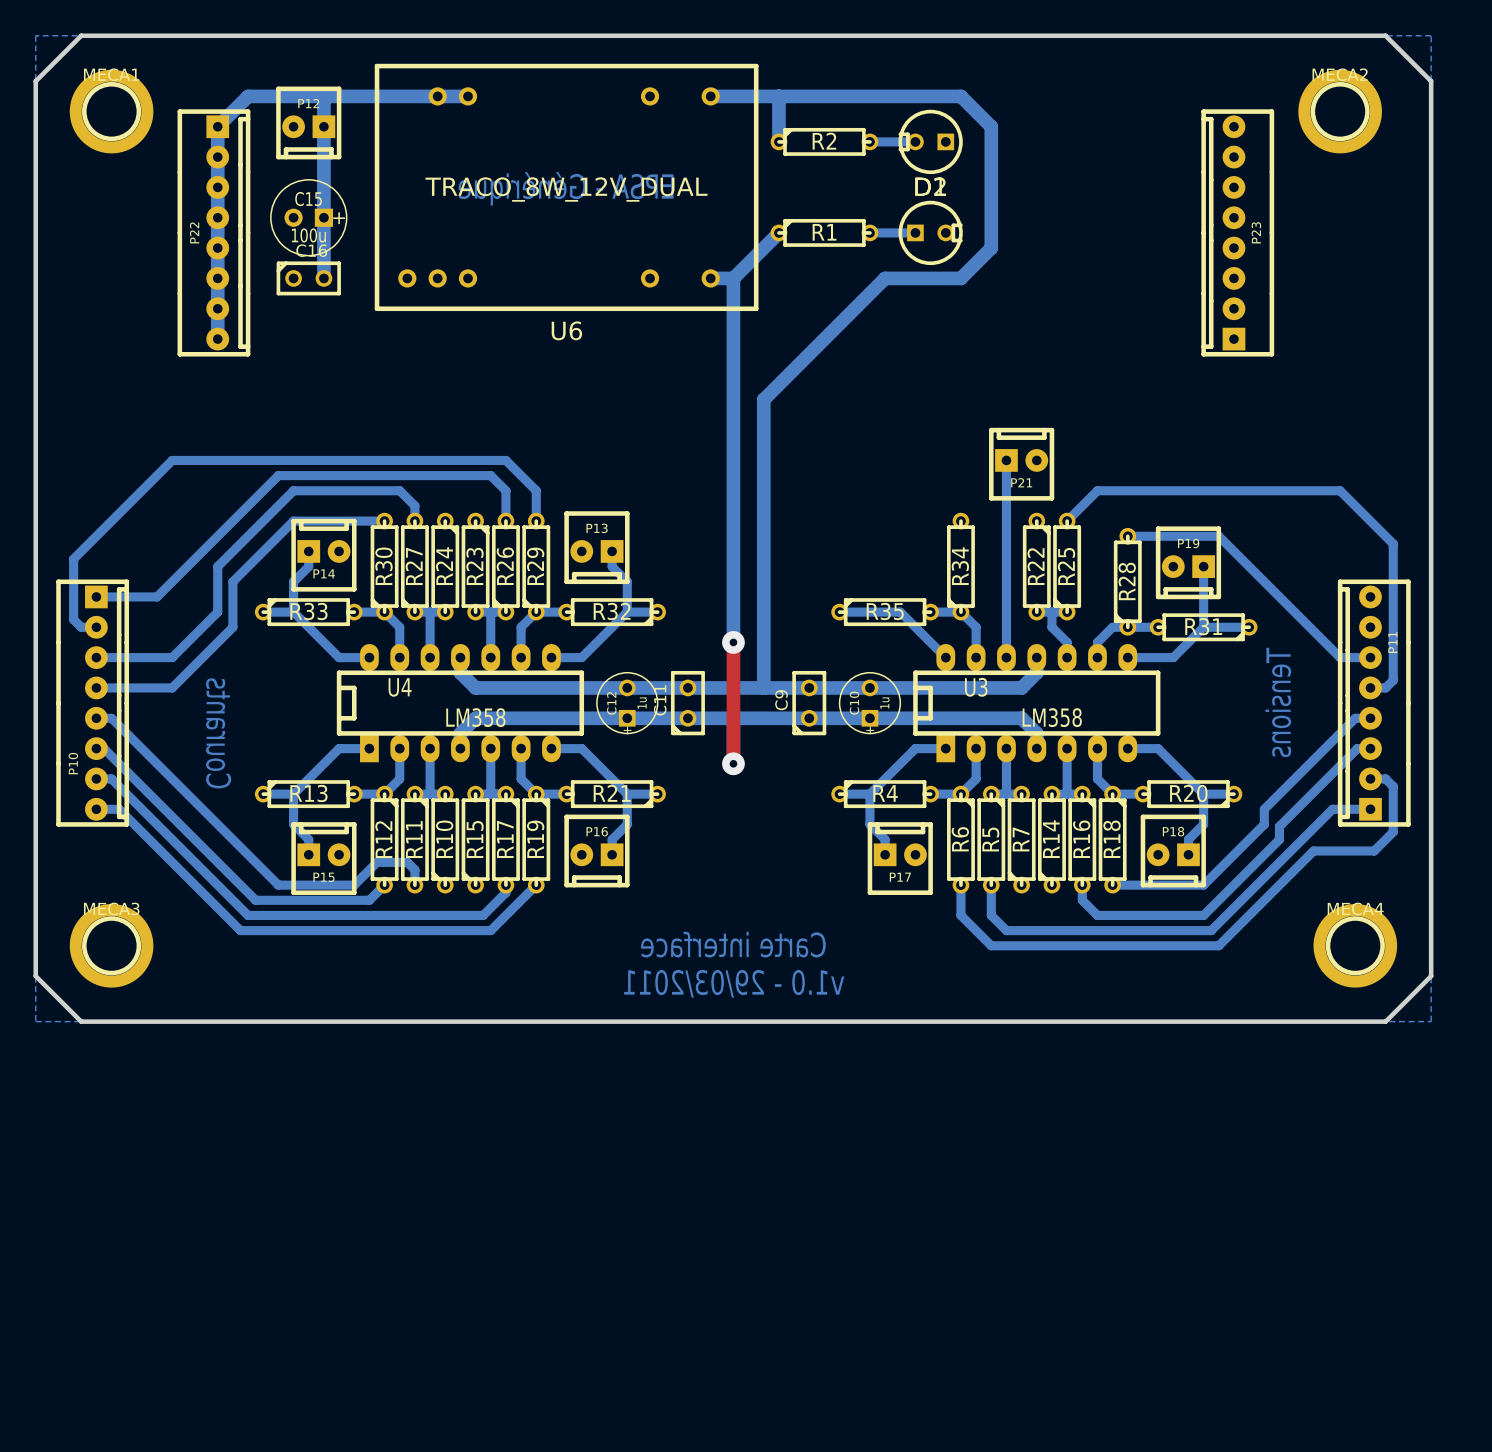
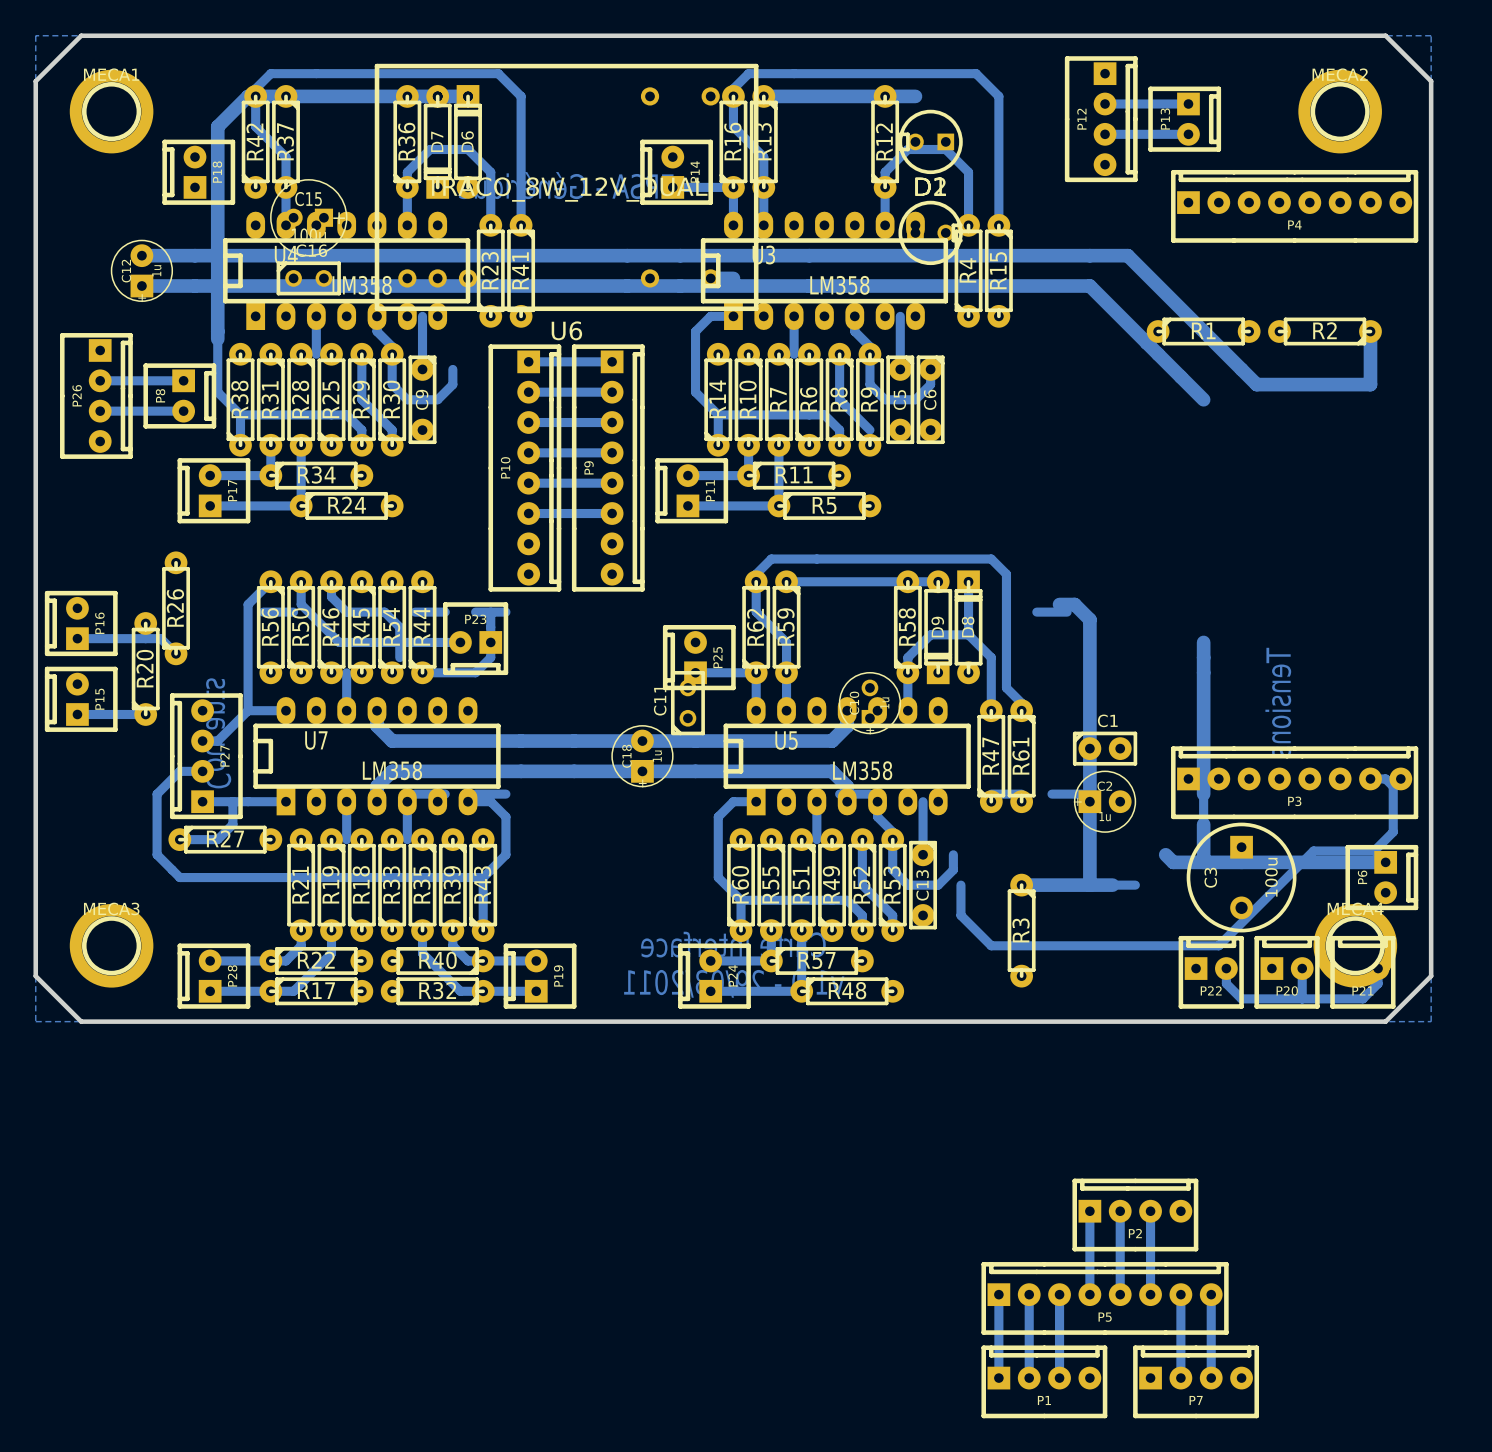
P12 footprint: [276, 86, 342, 160] -> [1064, 56, 1138, 183]
bottom track: (323, 96) (323, 278) -> none
bottom track: (710, 96) (763, 96) -> none
bottom track: (778, 96) (778, 141) -> none
bottom track: (915, 96) (960, 96) (991, 126) (991, 248) (960, 278) (885, 278) (763, 399) (763, 687) -> none
P12 name position: P12 (308, 103) -> P12 (1081, 119)
bottom track: none -> (1105, 104) (1188, 104)
P22 footprint: [177, 109, 251, 357] -> [1178, 935, 1244, 1009]
P23 footprint: [1201, 109, 1275, 357] -> [442, 602, 509, 676]
R2 footprint: [770, 127, 879, 156] -> [1268, 317, 1382, 346]
bottom track: none -> (1105, 134) (1188, 134)
R42: none -> (255, 141)
R37: none -> (286, 141)
R36: none -> (407, 141)
D7: none -> (437, 141)
D6: none -> (468, 141)
bottom track: (869, 141) (915, 141) -> none
bottom track: none -> (672, 187) (733, 187) (733, 225)
P4: none -> (1294, 206)
R1 footprint: [770, 218, 879, 247] -> [1146, 317, 1261, 346]
bottom track: none -> (286, 225) (286, 157) (255, 126) (255, 88) (270, 73) (498, 73) (521, 96) (521, 225)
bottom track: none -> (407, 225) (407, 172) (430, 149) (468, 149) (490, 172) (490, 225)
bottom track: none -> (763, 225) (763, 157) (733, 126) (733, 88) (748, 73) (976, 73) (998, 96) (998, 225)
bottom track: none -> (885, 225) (885, 172) (907, 149) (945, 149) (968, 172) (968, 225)
P22 name position: P22 (194, 232) -> P22 (1211, 990)
bottom track: (778, 232) (733, 278) (733, 642) -> none
bottom track: (869, 232) (915, 232) -> none
P23 name position: P23 (1256, 232) -> P23 (475, 619)
bottom track: none -> (141, 255) (1127, 255) (1256, 384) (1370, 384) (1370, 331)
R41: none -> (521, 270)
bottom track: none -> (141, 286) (1089, 286) (1203, 399)
bottom track: none -> (316, 316) (316, 354)
bottom track: none -> (377, 316) (377, 331) (392, 346) (392, 384) (407, 399) (437, 399) (452, 384) (452, 369)
bottom track: none -> (422, 316) (422, 369)
bottom track: none -> (733, 316) (710, 316) (695, 331) (695, 392) (718, 414)
bottom track: none -> (794, 316) (794, 354)
bottom track: none -> (854, 316) (854, 331) (869, 346) (869, 384) (885, 399) (915, 399) (930, 384) (930, 369)
bottom track: none -> (900, 316) (900, 369)
bottom track: none -> (217, 339) (217, 392) (240, 414)
bottom track: none -> (361, 354) (361, 399) (392, 430) (392, 445)
bottom track: none -> (839, 354) (839, 399) (869, 430)
bottom track: none -> (528, 361) (612, 361)
bottom track: none -> (100, 380) (183, 380)
bottom track: none -> (528, 392) (612, 392)
P26: none -> (96, 395)
P8: none -> (179, 395)
R38: none -> (240, 399)
R8: none -> (839, 399)
R9: none -> (869, 399)
C5: none -> (900, 399)
C6: none -> (930, 399)
bottom track: none -> (100, 411) (183, 411)
bottom track: none -> (240, 414) (346, 414) (361, 430) (361, 445)
bottom track: none -> (240, 414) (240, 445)
bottom track: none -> (718, 414) (718, 445)
bottom track: none -> (718, 414) (824, 414) (839, 430) (839, 445)
bottom track: none -> (528, 422) (612, 422)
bottom track: none -> (270, 445) (270, 475) (210, 475)
bottom track: none -> (301, 445) (301, 505) (210, 505)
bottom track: none -> (748, 445) (748, 475) (687, 475)
bottom track: none -> (778, 445) (778, 505) (687, 505)
bottom track: none -> (528, 452) (612, 452)
bottom track: (1006, 460) (1006, 574) -> (786, 710) (786, 642) (756, 612) (756, 574) (771, 559) (991, 559) (1006, 574)
P21 position: (1021, 464) -> (1362, 972)
P9: none -> (608, 468)
bottom track: none -> (528, 483) (612, 483)
R30 footprint: [370, 512, 399, 621] -> [378, 342, 407, 457]
R27 footprint: [400, 512, 429, 621] -> [168, 825, 283, 854]
R24 footprint: [431, 512, 460, 621] -> [289, 491, 404, 520]
R23 footprint: [461, 512, 490, 621] -> [476, 213, 505, 328]
R26 footprint: [491, 512, 520, 621] -> [162, 551, 191, 666]
R29 footprint: [522, 512, 551, 621] -> [347, 342, 376, 457]
R34 footprint: [947, 512, 975, 621] -> [259, 461, 374, 490]
R22 footprint: [1022, 512, 1051, 621] -> [259, 947, 374, 975]
R25 footprint: [1053, 512, 1082, 621] -> [317, 342, 346, 457]
bottom track: none -> (528, 513) (612, 513)
bottom track: (384, 521) (293, 521) (232, 581) (232, 627) (172, 687) (96, 687) -> none
bottom track: (414, 521) (414, 505) (399, 490) (293, 490) (217, 566) (217, 612) (172, 657) (96, 657) -> none
bottom track: (505, 521) (505, 490) (490, 475) (278, 475) (157, 596) (96, 596) -> none
bottom track: (536, 521) (536, 490) (505, 460) (172, 460) (73, 559) (73, 619) (81, 627) (96, 627) -> none
bottom track: (1067, 521) (1097, 490) (1340, 490) (1393, 543) (1393, 680) (1385, 687) (1370, 687) -> none
R28 footprint: [1113, 527, 1142, 636] -> [287, 342, 316, 457]
bottom track: (1127, 536) (1218, 536) (1340, 657) (1370, 657) -> none
P13 rotation: 0° (596, 547) -> 90° counterclockwise (1184, 119)
P13 position: (596, 547) -> (1184, 119)
bottom track: (308, 551) (308, 566) (293, 581) (293, 612) (339, 657) (369, 657) -> none
bottom track: (612, 551) (612, 566) (627, 581) (627, 612) -> none
P14 rotation: 0° (323, 555) -> 90° counterclockwise (676, 172)
P14 position: (323, 555) -> (676, 172)
P19 rotation: 0° (1188, 562) -> 90° clockwise (540, 976)
P19 position: (1188, 562) -> (540, 976)
bottom track: (1203, 566) (1203, 627) -> none
P11 footprint: [1337, 579, 1411, 827] -> [655, 458, 729, 524]
bottom track: none -> (270, 581) (248, 604) (248, 710)
bottom track: none -> (301, 581) (301, 604) (339, 642) (460, 642)
bottom track: none -> (331, 581) (331, 596) (346, 612) (354, 612)
bottom track: none -> (786, 581) (938, 581)
bottom track: none -> (968, 581) (968, 634)
R33 footprint: [254, 598, 363, 627] -> [378, 828, 407, 943]
R32 footprint: [558, 598, 666, 627] -> [380, 977, 495, 1006]
R35 footprint: [831, 598, 939, 627] -> [408, 828, 437, 943]
bottom track: none -> (1059, 604) (1074, 604) (1089, 619) (1089, 885)
bottom track: (430, 612) (430, 657) -> none
bottom track: (566, 612) (536, 612) (521, 627) (521, 657) -> none
bottom track: (627, 612) (581, 657) (551, 657) -> none
bottom track: (627, 612) (657, 612) -> none
bottom track: (839, 612) (900, 612) (945, 657) -> none
bottom track: (930, 612) (960, 612) (976, 627) (976, 657) -> none
bottom track: (1051, 612) (1051, 627) (1067, 642) (1067, 657) -> none
R31 footprint: [1149, 613, 1258, 642] -> [256, 342, 285, 457]
R56: none -> (270, 627)
R50: none -> (301, 627)
R46: none -> (331, 627)
R45: none -> (361, 627)
R54: none -> (392, 627)
R44: none -> (422, 627)
R62: none -> (756, 627)
R59: none -> (786, 627)
R58: none -> (907, 627)
D9: none -> (938, 627)
D8: none -> (968, 627)
bottom track: (1158, 627) (1112, 627) (1097, 642) (1097, 657) -> none
bottom track: (1203, 627) (1249, 627) -> none
bottom track: (1203, 627) (1173, 657) (1127, 657) -> none
bottom track: none -> (968, 634) (930, 634) (907, 657) (907, 710)
bottom track: none -> (968, 634) (991, 657) (991, 710)
bottom track: none -> (77, 638) (160, 638) (176, 653)
top track: (733, 642) (733, 763) -> none
via: (733, 642) -> none
bottom track: none -> (1203, 642) (1203, 794)
P11 name position: P11 (1392, 642) -> P11 (710, 490)
bottom track: (460, 657) (460, 672) (475, 687) (1021, 687) (1036, 672) (1036, 657) -> none
bottom track: none -> (490, 657) (475, 672) (422, 672)
P25: none -> (699, 657)
bottom track: none -> (1006, 657) (1006, 687) (1021, 703) (1021, 710)
C9 footprint: [792, 670, 827, 736] -> [408, 355, 437, 445]
C12 footprint: [596, 671, 659, 735] -> [110, 239, 174, 302]
bottom track: none -> (346, 672) (346, 710)
bottom track: none -> (695, 672) (756, 672) (756, 710)
C9 name position: C9 (781, 700) -> C9 (422, 399)
P10 position: (92, 703) -> (524, 468)
U4 position: (460, 703) -> (346, 270)
U3 position: (1036, 703) -> (824, 270)
bottom track: none -> (248, 710) (217, 741) (202, 741)
bottom track: none -> (248, 710) (286, 710)
bottom track: none -> (377, 710) (377, 725) (392, 741) (832, 741) (847, 725) (847, 710)
bottom track: none -> (77, 714) (145, 714)
bottom track: (96, 718) (111, 718) (278, 885) (354, 885) (377, 862) (407, 862) (414, 869) (414, 885) -> none
bottom track: (1370, 718) (1355, 718) (1264, 809) (1264, 824) (1203, 885) (1135, 885) -> none
bottom track: (96, 748) (104, 748) (255, 900) (369, 900) (384, 885) -> none
bottom track: (369, 748) (339, 748) (293, 794) -> none
bottom track: (399, 748) (399, 778) (384, 794) (354, 794) -> none
bottom track: (430, 748) (430, 794) -> none
bottom track: (460, 748) (460, 733) (475, 718) (1021, 718) (1036, 733) (1036, 748) -> none
bottom track: (490, 748) (490, 794) -> none
bottom track: (521, 748) (521, 778) (536, 794) (566, 794) -> none
bottom track: (551, 748) (581, 748) (627, 794) -> none
bottom track: (945, 748) (915, 748) (869, 794) (869, 824) (885, 839) (885, 854) -> none
bottom track: (976, 748) (976, 778) (960, 794) (930, 794) -> none
bottom track: (1006, 748) (1006, 794) -> none
bottom track: (1067, 748) (1067, 794) -> none
bottom track: (1097, 748) (1097, 778) (1112, 794) (1142, 794) -> none
C1: none -> (1105, 748)
bottom track: (1127, 748) (1158, 748) (1203, 794) (1233, 794) -> none
bottom track: (1370, 748) (1357, 748) (1279, 826) (1279, 839) (1203, 915) (1097, 915) (1082, 900) (1082, 885) -> none
P27: none -> (206, 756)
U7: none -> LM358 (377, 756)
C18: none -> 1u (642, 756)
U5: none -> LM358 (847, 756)
R47: none -> (991, 756)
R61: none -> (1021, 756)
P10 name position: P10 (73, 763) -> P10 (505, 467)
via: (733, 763) -> none
bottom track: none -> (202, 771) (179, 771) (157, 794) (157, 854) (179, 877) (483, 877)
bottom track: (96, 778) (111, 778) (248, 915) (483, 915) (505, 892) (505, 885) -> none
R13 footprint: [254, 780, 363, 809] -> [749, 85, 778, 199]
R21 footprint: [558, 780, 666, 809] -> [287, 828, 316, 943]
R4 footprint: [831, 780, 939, 809] -> [954, 213, 983, 328]
R20 footprint: [1134, 780, 1243, 809] -> [131, 612, 160, 726]
P3: none -> (1294, 782)
R12 footprint: [370, 785, 399, 894] -> [871, 85, 900, 199]
R11 footprint: [400, 785, 429, 894] -> [737, 461, 852, 490]
R10 footprint: [431, 785, 460, 894] -> [734, 342, 763, 457]
R15 footprint: [461, 785, 490, 894] -> [984, 213, 1013, 328]
R17 footprint: [491, 785, 520, 894] -> [259, 977, 374, 1006]
R19 footprint: [522, 785, 551, 894] -> [317, 828, 346, 943]
R6 footprint: [947, 785, 975, 894] -> [795, 342, 824, 457]
R5 footprint: [977, 785, 1006, 894] -> [767, 491, 882, 520]
R7 footprint: [1007, 785, 1036, 894] -> [765, 342, 793, 457]
R14 footprint: [1038, 785, 1066, 894] -> [704, 342, 733, 457]
R16 footprint: [1068, 785, 1097, 894] -> [719, 85, 748, 199]
R18 footprint: [1098, 785, 1127, 894] -> [347, 828, 376, 943]
bottom track: (263, 794) (293, 794) -> none
bottom track: (293, 794) (293, 824) (308, 839) (308, 854) -> none
bottom track: (627, 794) (657, 794) -> none
bottom track: (627, 794) (627, 824) (612, 839) (612, 854) -> none
bottom track: none -> (202, 801) (286, 801)
bottom track: none -> (232, 801) (232, 824) (217, 839) (179, 839)
bottom track: none -> (346, 801) (346, 839)
bottom track: none -> (377, 801) (377, 786) (392, 771) (832, 771) (847, 786) (847, 801)
bottom track: none -> (407, 801) (407, 839)
bottom track: none -> (468, 801) (490, 801) (505, 816) (505, 854) (483, 877)
bottom track: none -> (756, 801) (733, 801) (718, 816) (718, 877) (741, 900)
bottom track: none -> (816, 801) (816, 839)
bottom track: none -> (877, 801) (877, 816) (892, 832) (892, 869) (907, 885) (938, 885) (953, 869) (953, 854)
bottom track: none -> (923, 801) (923, 854)
C2: none -> 1u (1105, 801)
bottom track: (96, 809) (119, 809) (240, 930) (490, 930) (536, 885) -> none
bottom track: (1370, 809) (1332, 809) (1211, 930) (1006, 930) (991, 915) (991, 885) -> none
bottom track: (1203, 824) (1188, 839) (1188, 854) -> (1203, 824) (1203, 862)
bottom track: none -> (862, 839) (862, 885) (892, 915) (892, 930)
P16 rotation: 0° (596, 851) -> 90° clockwise (81, 623)
P16 position: (596, 851) -> (81, 623)
P18 rotation: 0° (1173, 851) -> 90° clockwise (198, 172)
P18 position: (1173, 851) -> (198, 172)
bottom track: none -> (1165, 854) (1173, 862) (1385, 862)
P15 rotation: 0° (323, 858) -> 90° counterclockwise (81, 699)
P15 position: (323, 858) -> (81, 699)
P17 rotation: 0° (900, 858) -> 90° counterclockwise (213, 490)
P17 position: (900, 858) -> (213, 490)
bottom track: none -> (483, 877) (483, 930)
C3: none -> 100u (1241, 877)
P6: none -> (1381, 877)
R39: none -> (452, 885)
R43: none -> (483, 885)
R60: none -> (741, 885)
R55: none -> (771, 885)
R51: none -> (801, 885)
R49: none -> (832, 885)
R52: none -> (862, 885)
R53: none -> (892, 885)
C13: none -> (923, 885)
bottom track: none -> (1021, 885) (1112, 885)
bottom track: none -> (741, 900) (741, 930)
bottom track: none -> (741, 900) (847, 900) (862, 915) (862, 930)
bottom track: none -> (301, 930) (301, 945) (286, 960) (210, 960)
bottom track: none -> (331, 930) (331, 953) (293, 991) (210, 991)
bottom track: none -> (422, 930) (422, 953) (460, 991) (536, 991)
bottom track: none -> (452, 930) (452, 945) (468, 960) (536, 960)
bottom track: none -> (771, 930) (771, 960) (710, 960)
bottom track: none -> (801, 930) (801, 991) (710, 991)
R3: none -> (1021, 930)
R40: none -> (437, 960)
R57: none -> (816, 960)
bottom track: none -> (1226, 968) (1226, 983) (1241, 998) (1362, 998) (1378, 983) (1378, 968)
bottom track: none -> (1302, 968) (1302, 998)
P20: none -> (1287, 972)
P28: none -> (213, 976)
P24: none -> (714, 976)
R48: none -> (847, 991)
bottom track: none -> (1089, 1211) (1089, 1294)
bottom track: none -> (1120, 1211) (1120, 1294)
bottom track: none -> (1150, 1211) (1150, 1294)
P2: none -> (1135, 1215)
bottom track: none -> (998, 1294) (998, 1378)
bottom track: none -> (1029, 1294) (1029, 1378)
bottom track: none -> (1059, 1294) (1059, 1378)
bottom track: none -> (1180, 1294) (1180, 1378)
bottom track: none -> (1211, 1294) (1211, 1378)
P5: none -> (1105, 1298)
P1: none -> (1044, 1381)
P7: none -> (1196, 1381)

